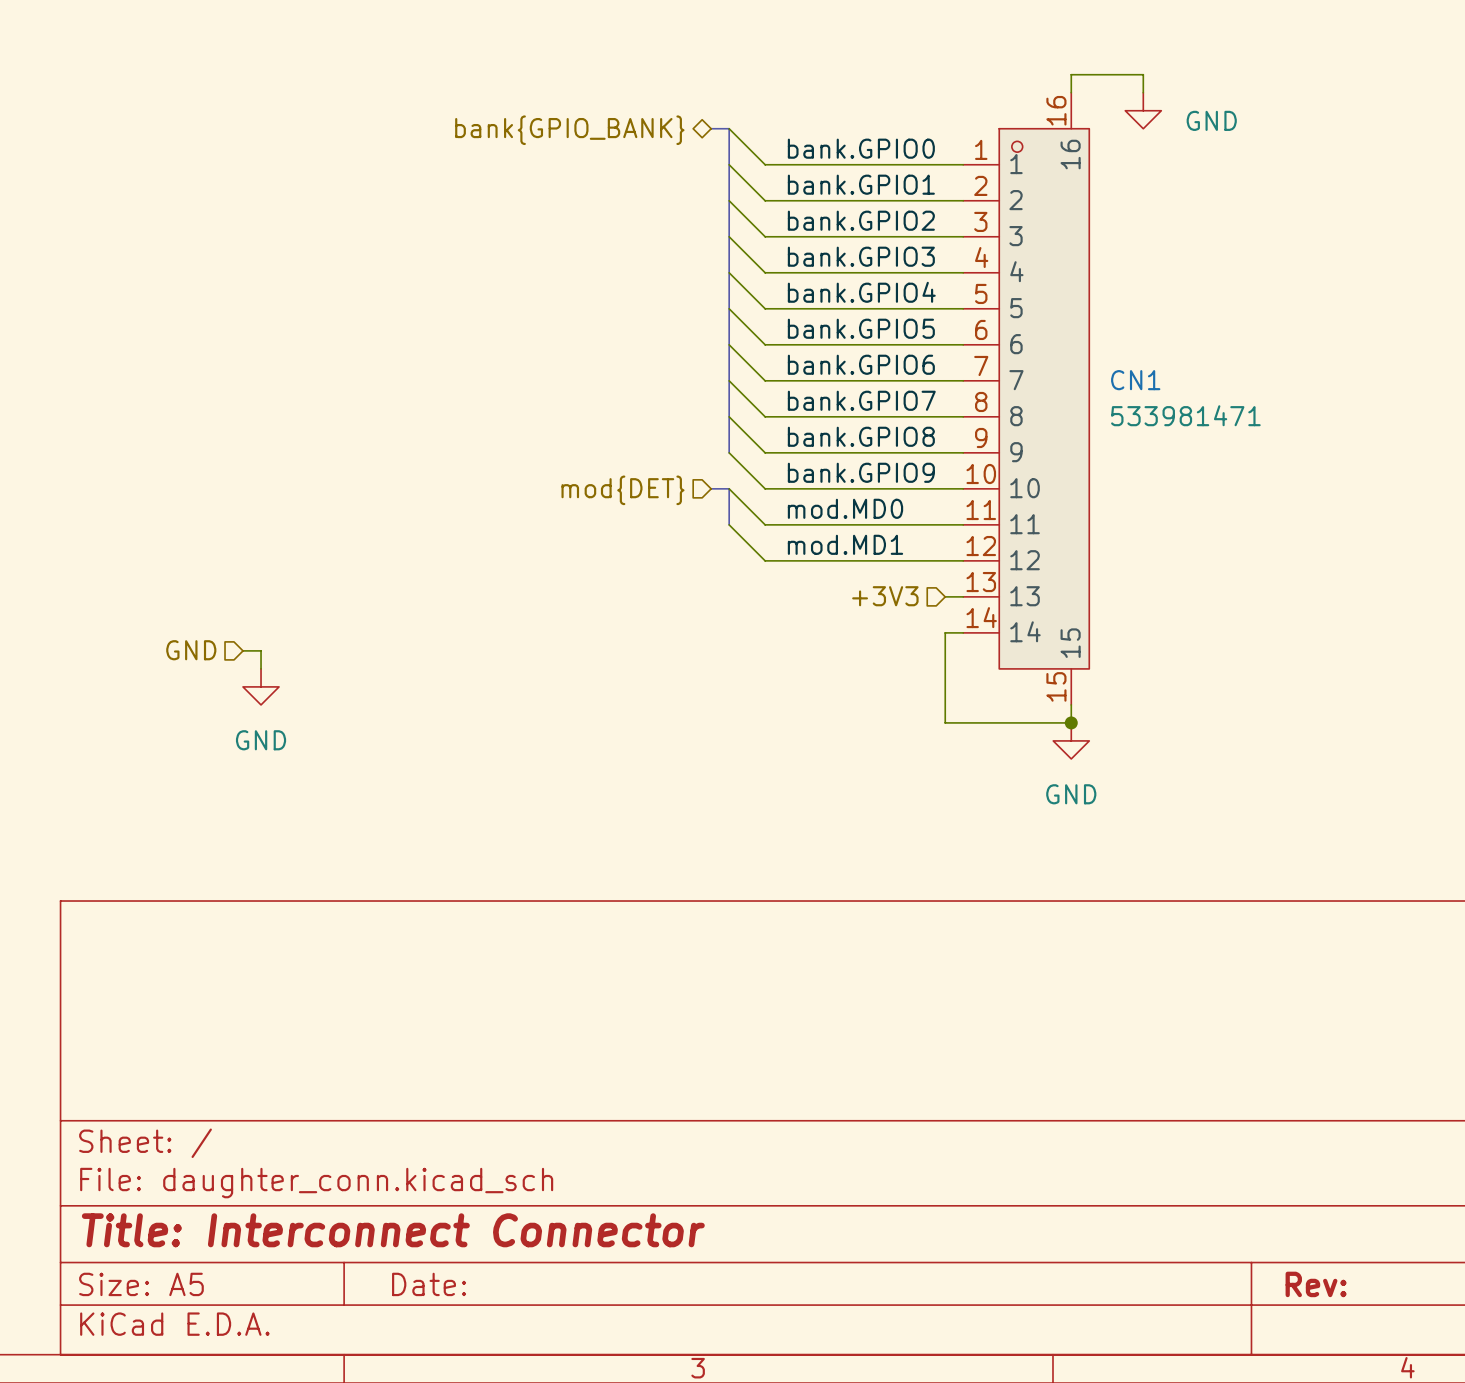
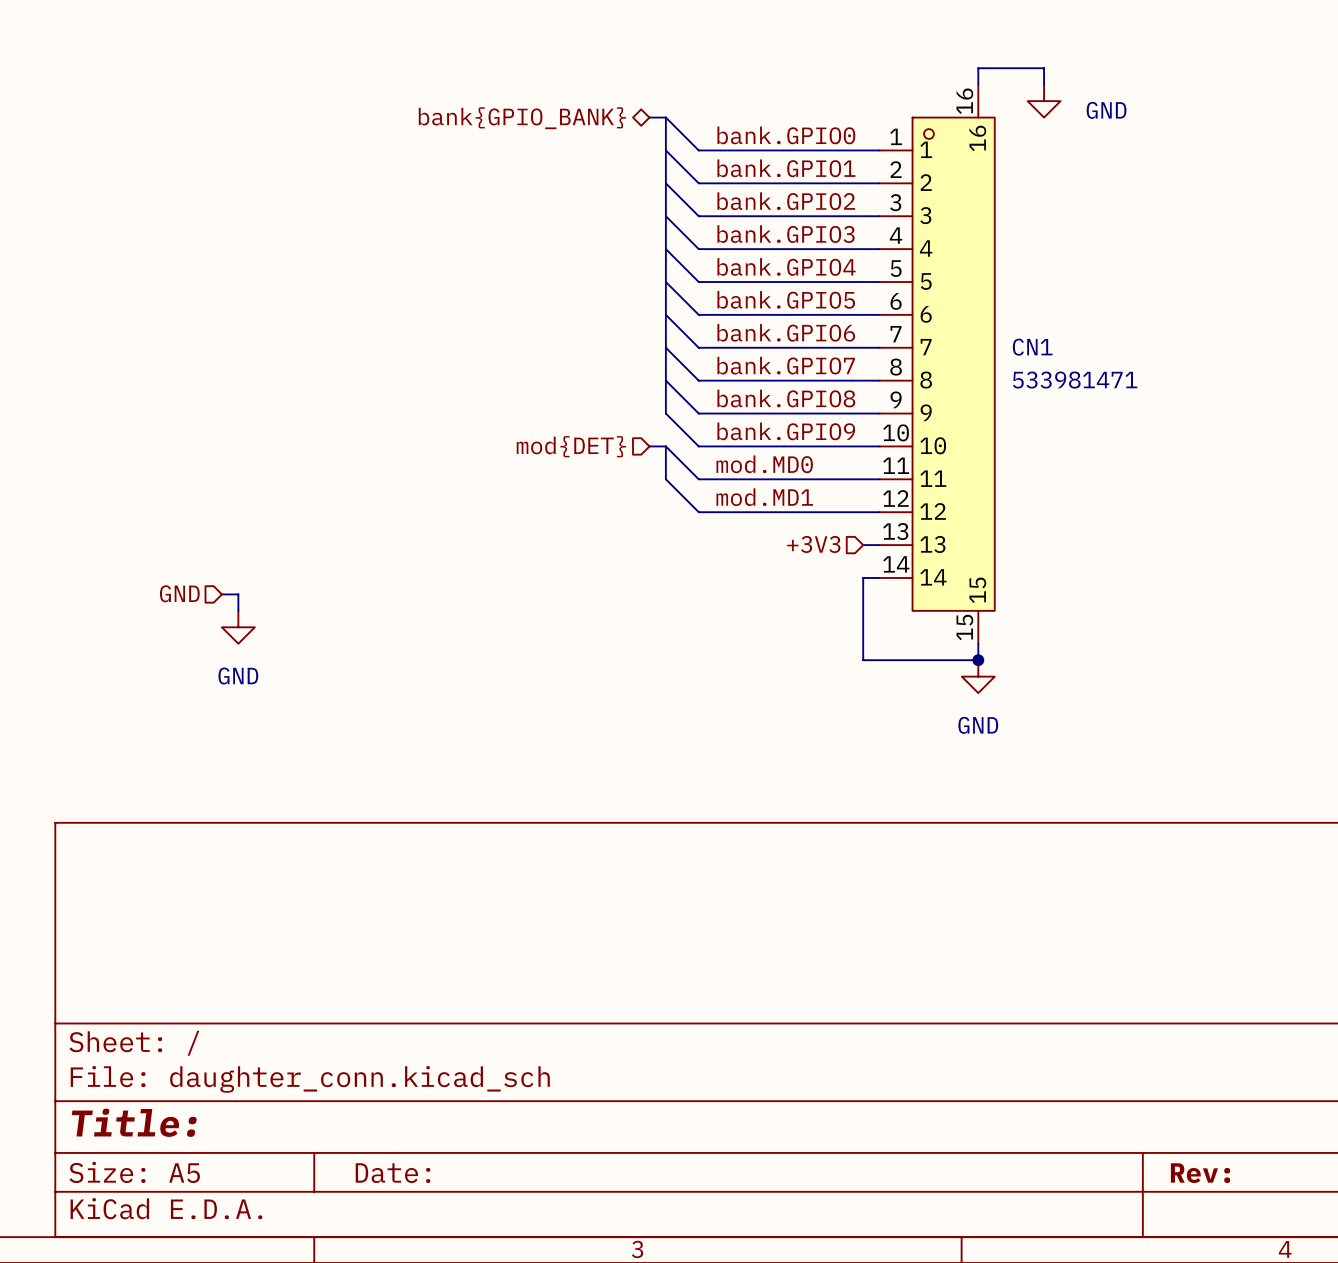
title block: Title: Interconnect Connector (393, 1230) -> Title: (134, 1122)

